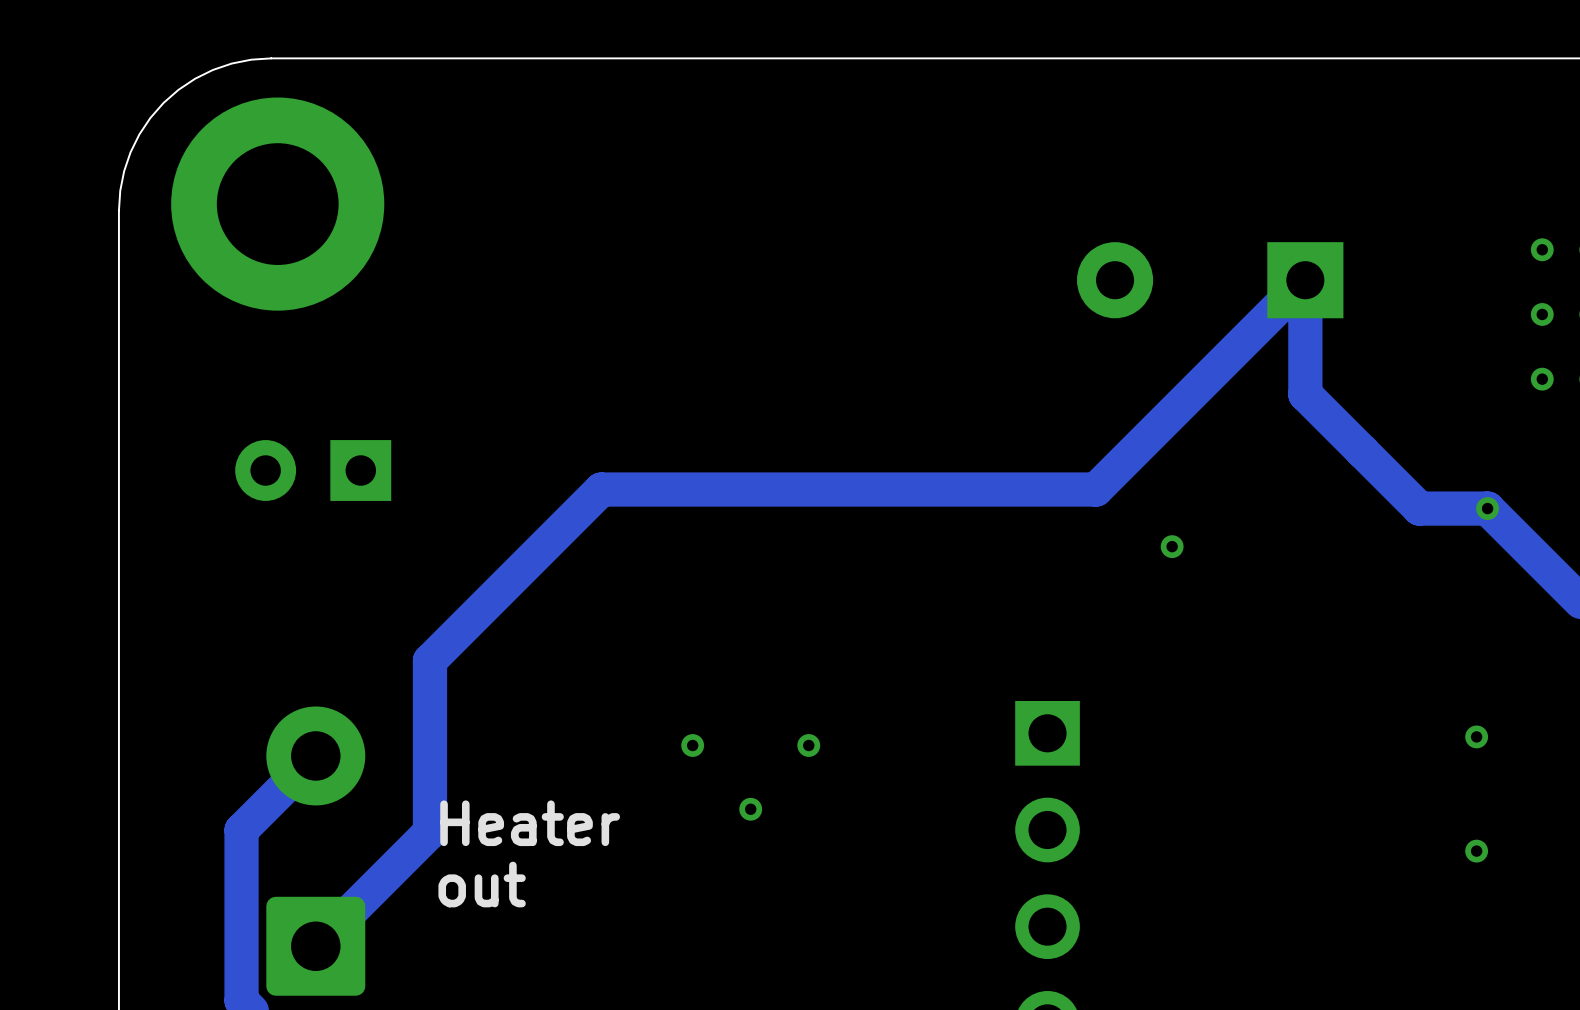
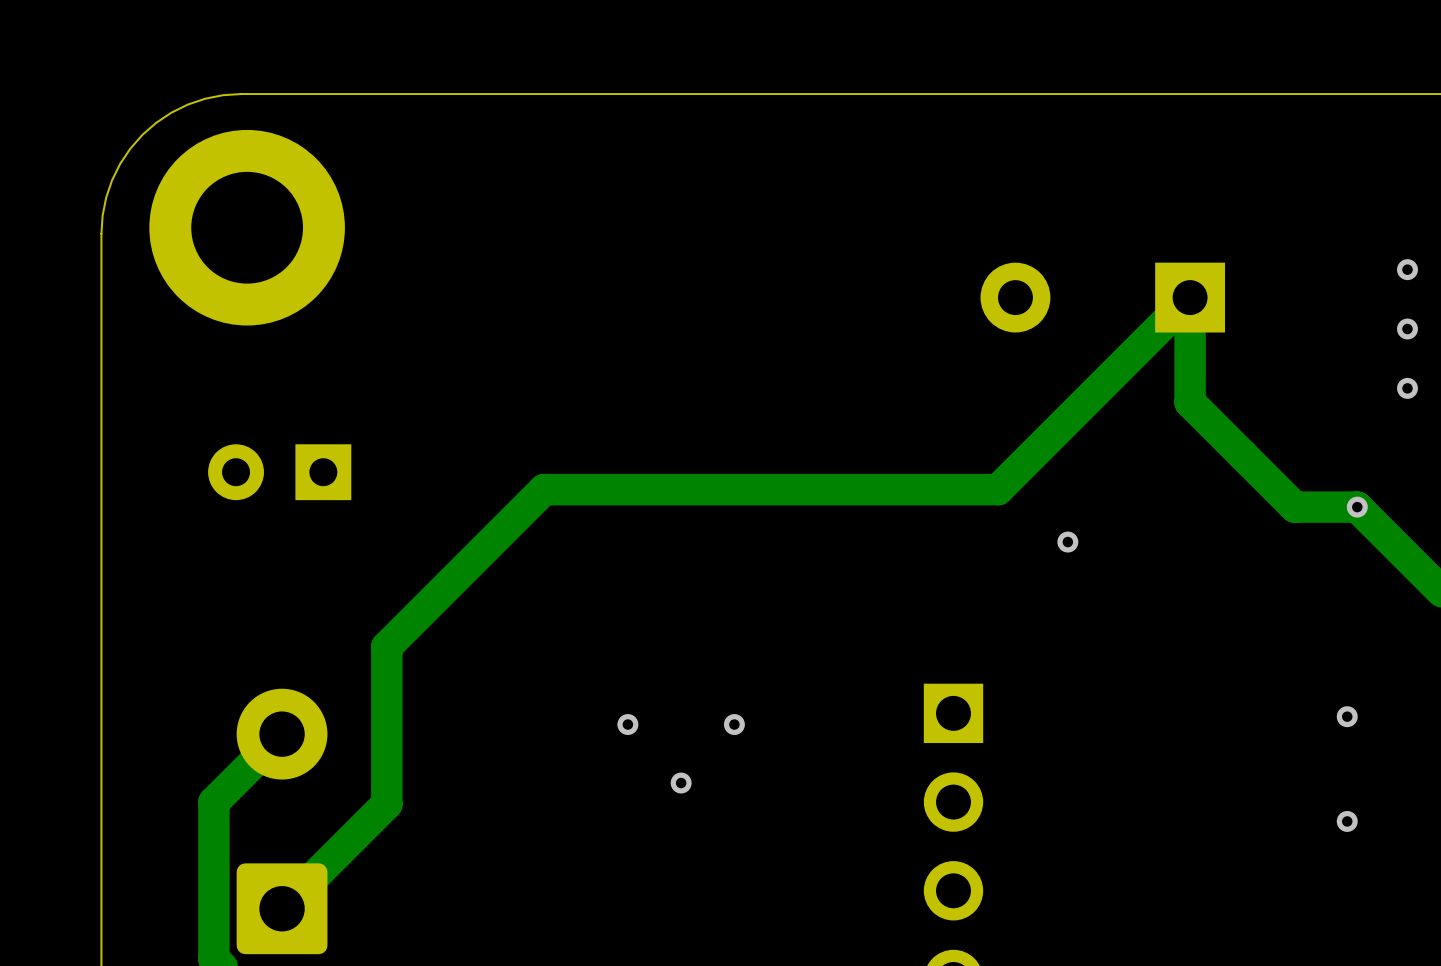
text: Heater (530, 823) -> none
text: out (482, 884) -> none

